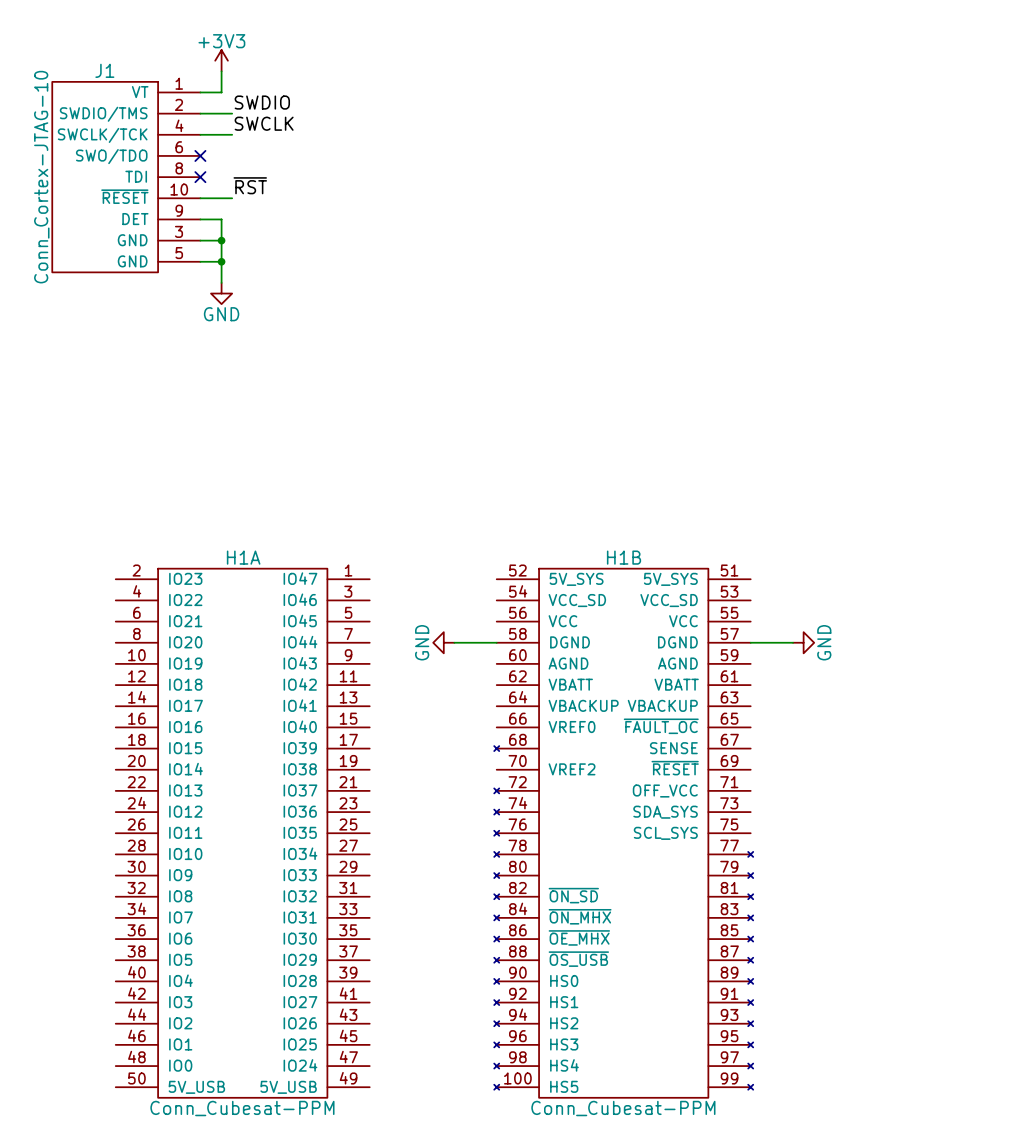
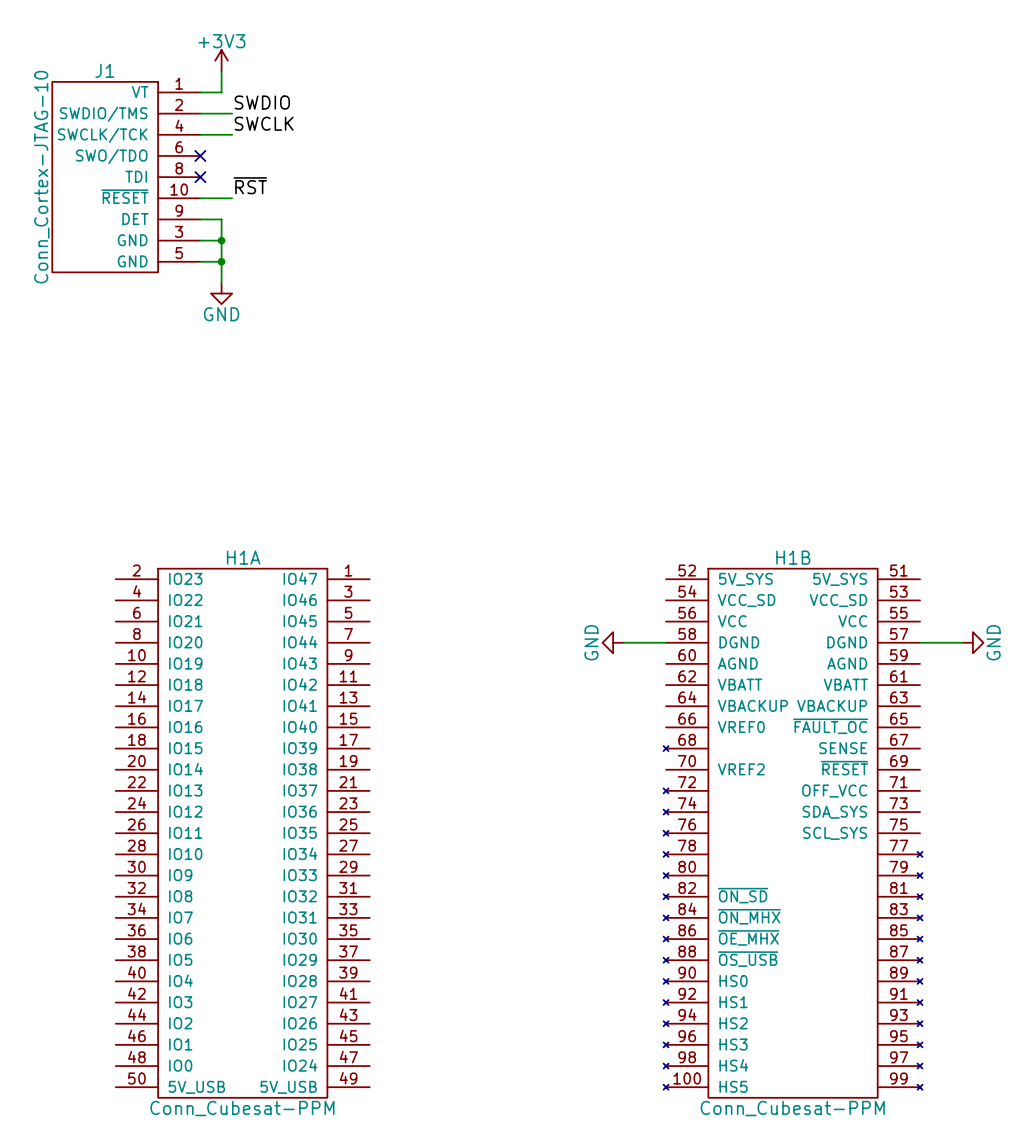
power symbol: GND (443, 642) -> none
wire: (454, 642) (496, 642) -> (623, 642) (666, 642)
power symbol: none -> GND (613, 642)
wire: (750, 642) (793, 642) -> (920, 642) (962, 642)
power symbol: GND (803, 642) -> none
power symbol: none -> GND (972, 642)
H1B position: (623, 833) -> (793, 833)

